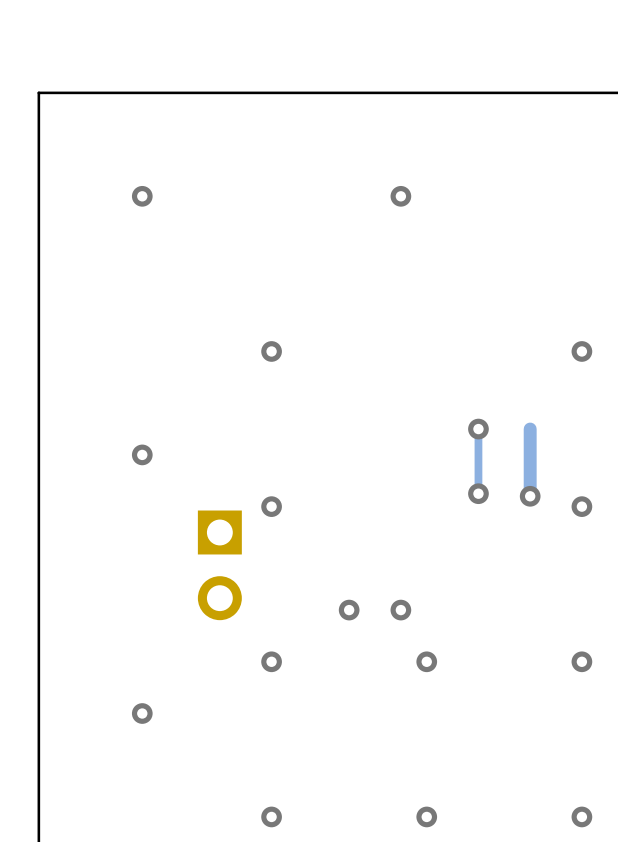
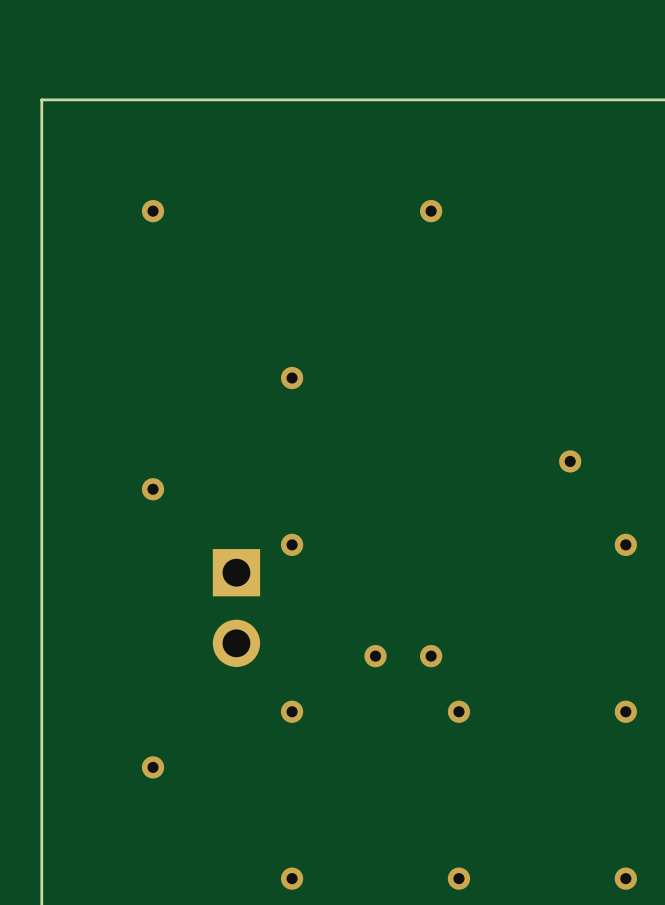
via: (581, 351) -> none
track: (478, 429) (478, 493) -> none
via: (478, 429) -> none
track: (530, 429) (530, 496) -> none
via: none -> (570, 461)
via: (478, 493) -> none
via: (530, 496) -> none

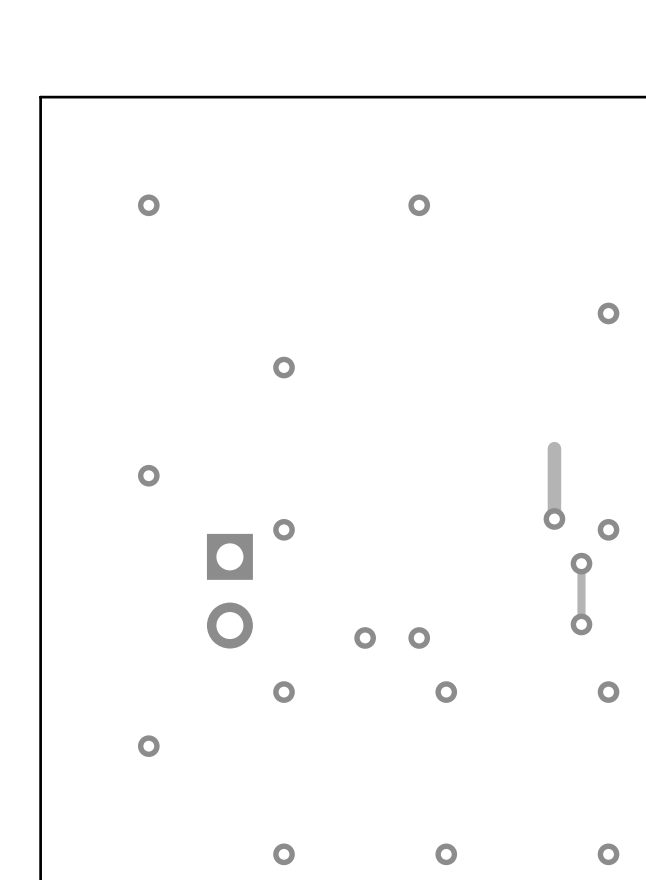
via: none -> (608, 313)
track: none -> (554, 448) (554, 519)
via: (570, 461) -> none
via: none -> (554, 519)
track: none -> (581, 563) (581, 624)
via: none -> (581, 563)
via: none -> (581, 624)

